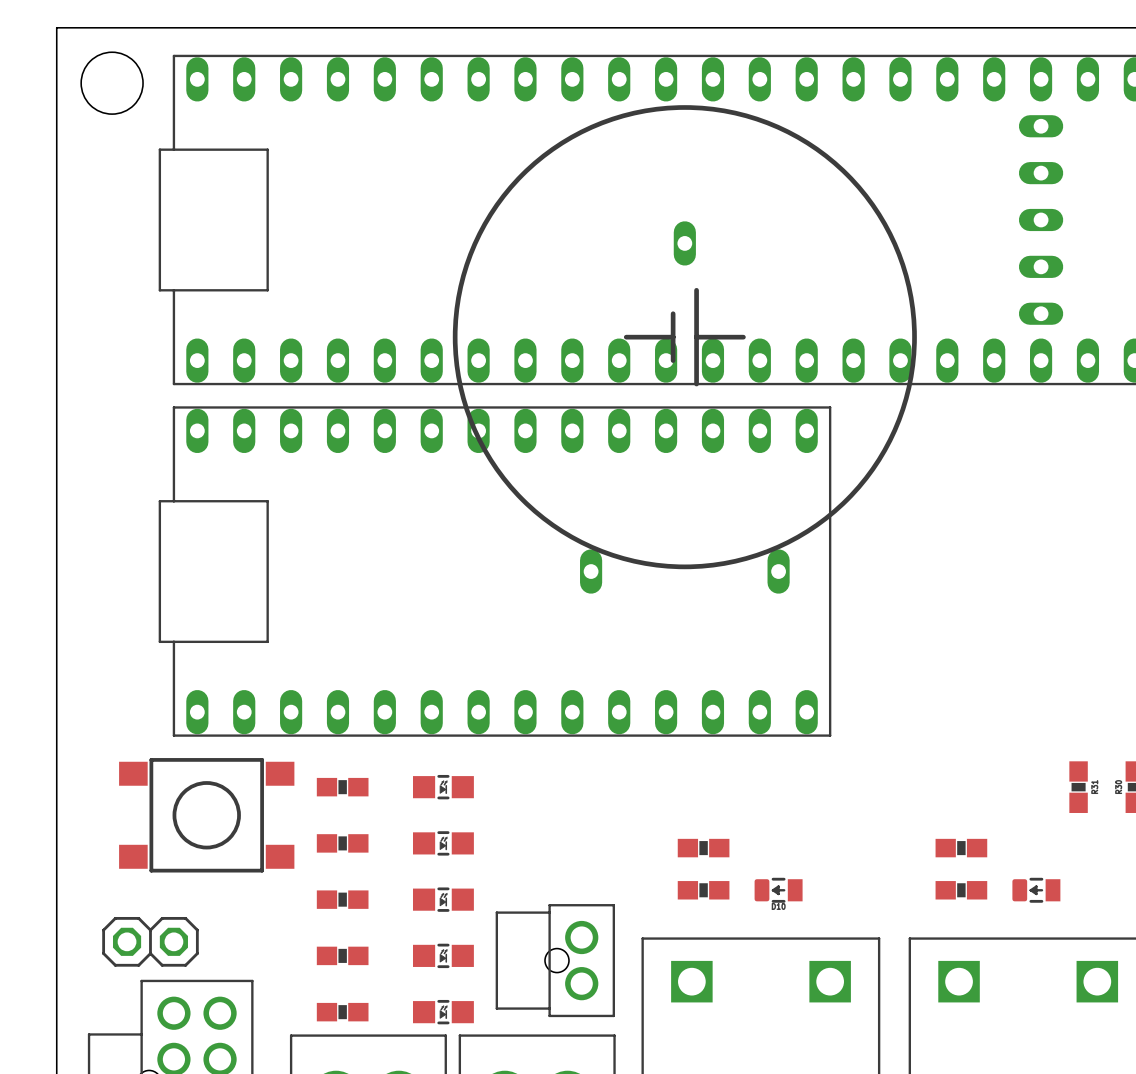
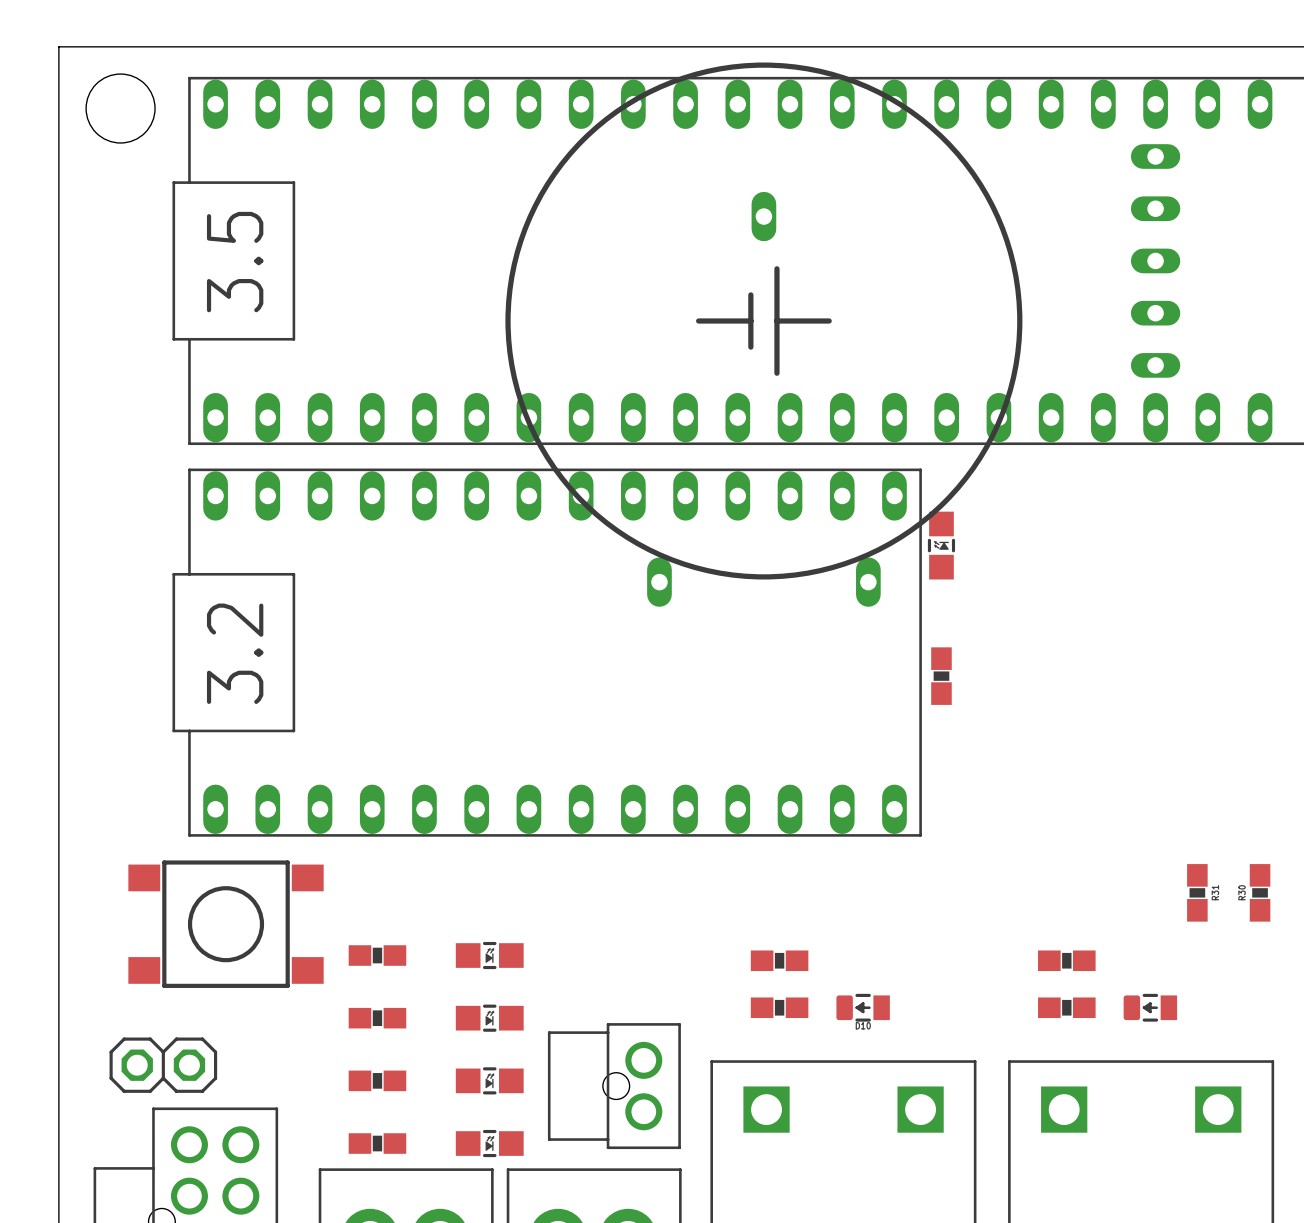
part text: none -> 3.5 (235, 262)
part position: (684, 349) -> (763, 334)
part: none -> (941, 545)
part text: none -> 3.2 (235, 653)
part: none -> (941, 676)
part: (342, 787) -> none
part: (443, 787) -> none

